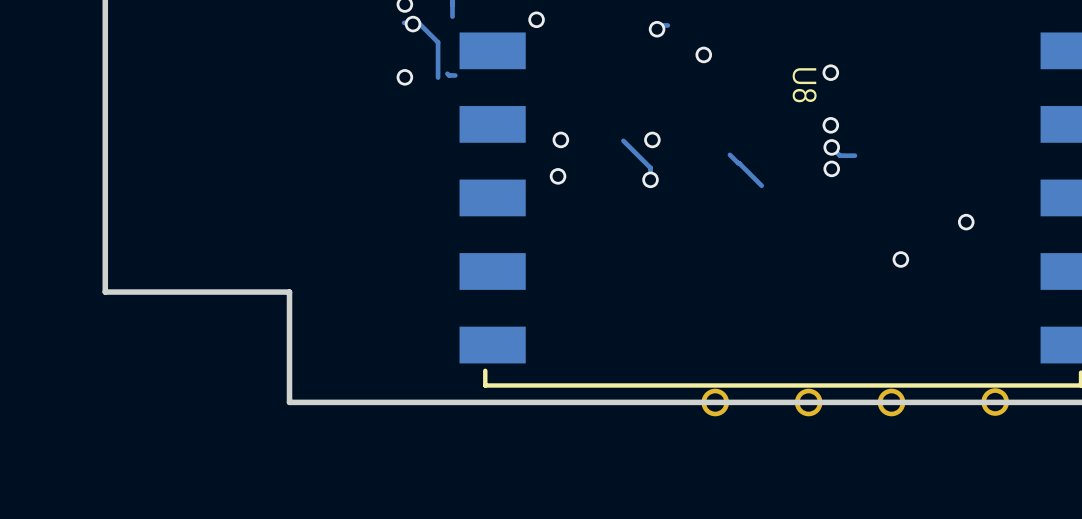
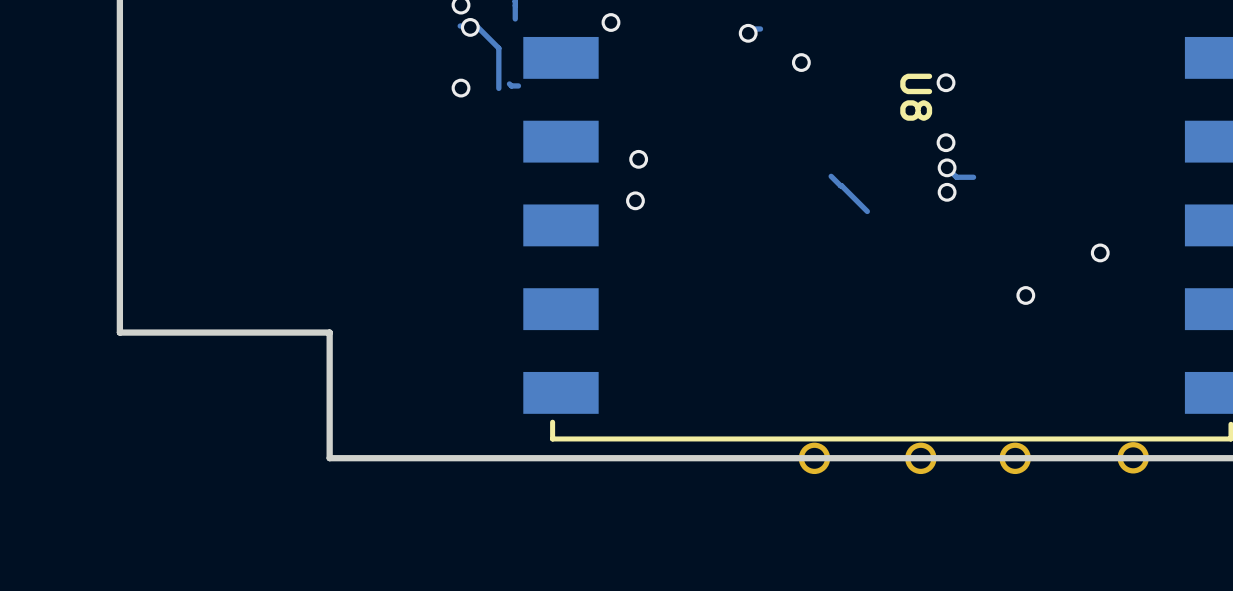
via: (652, 139) -> none
track: (623, 140) (650, 167) (650, 179) -> none
via: (650, 179) -> none

